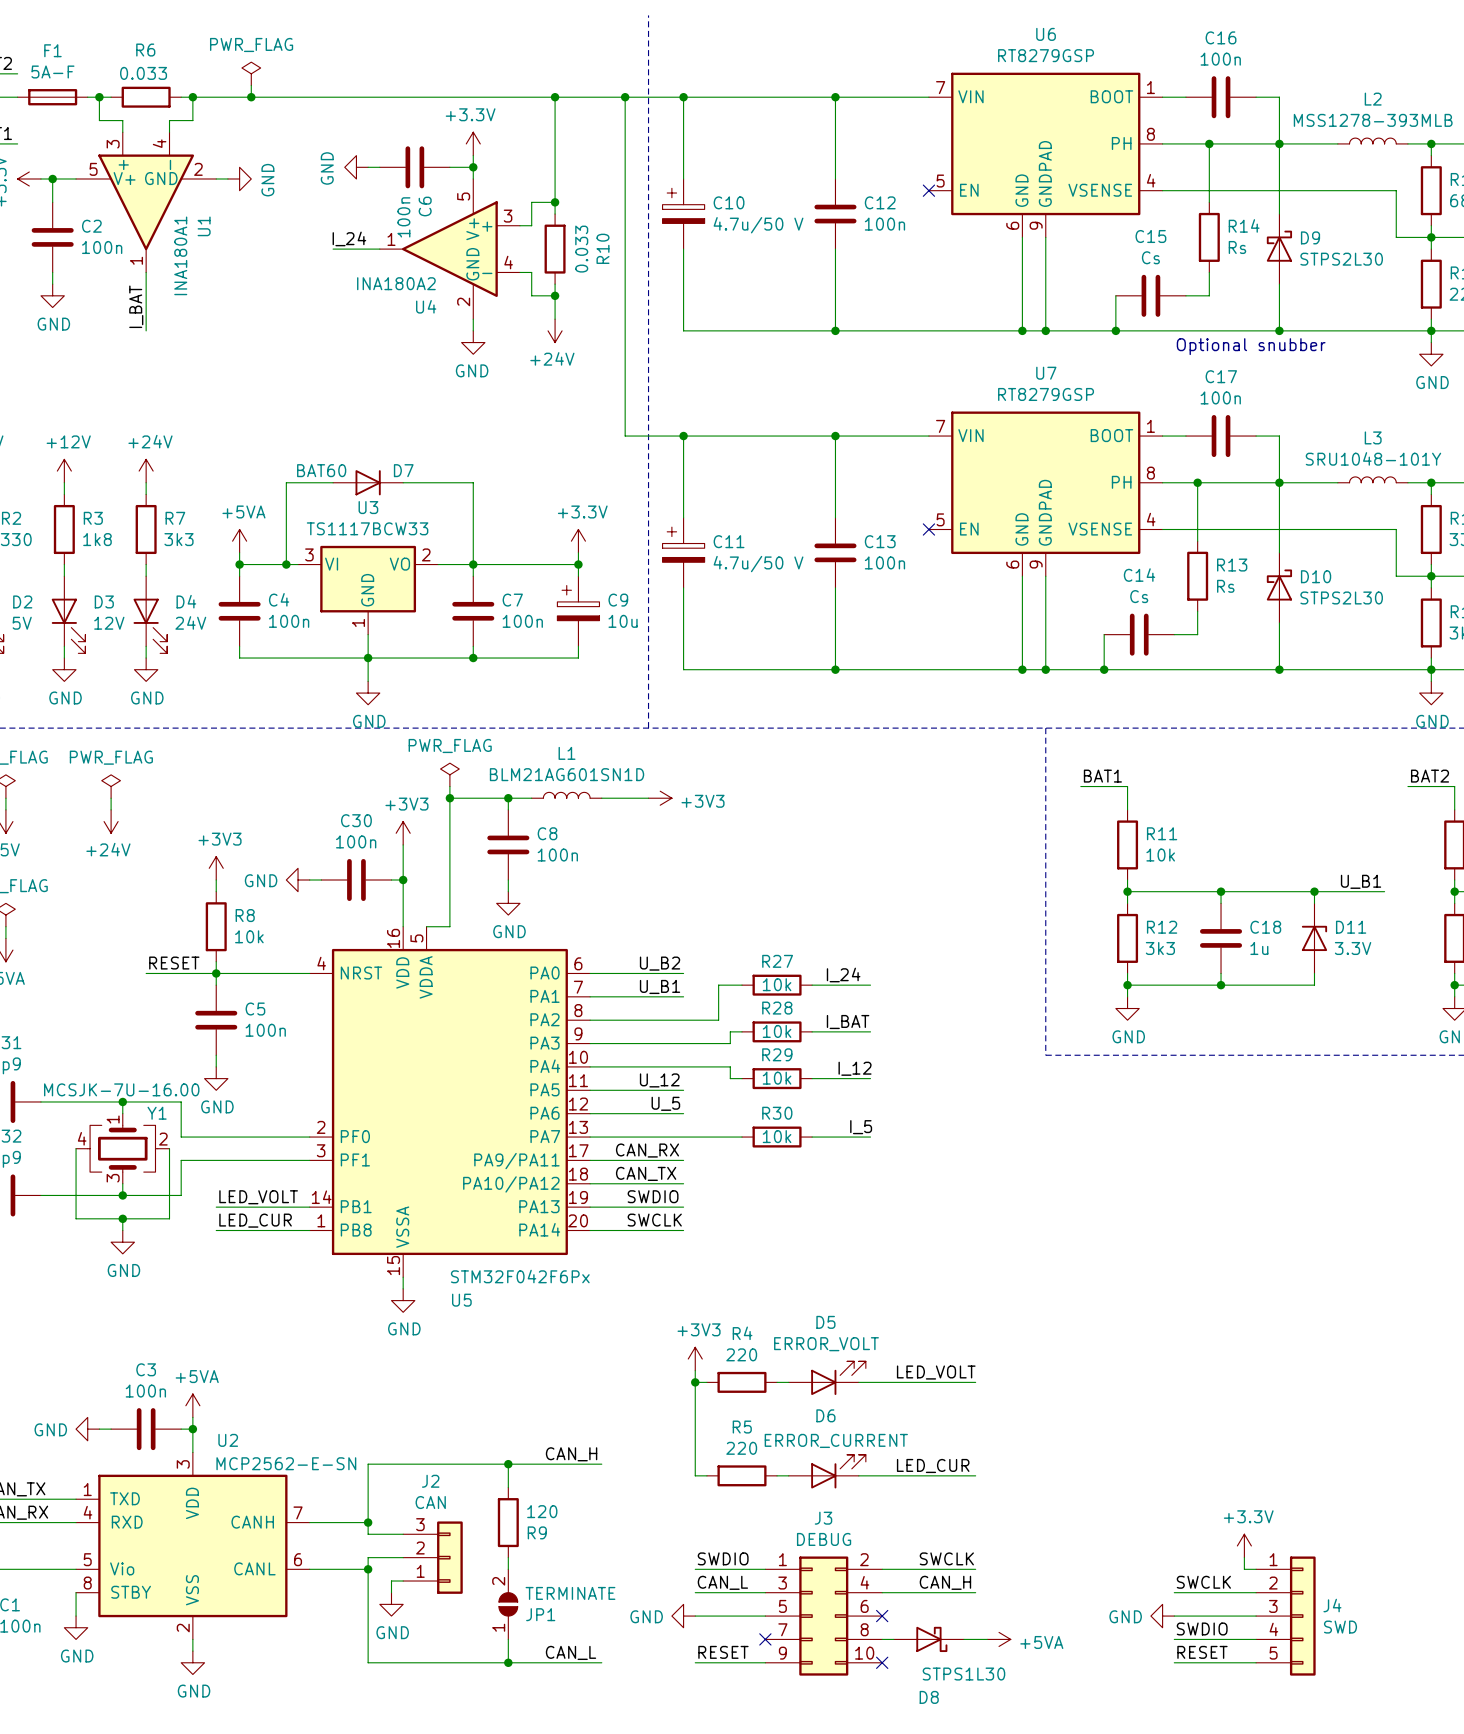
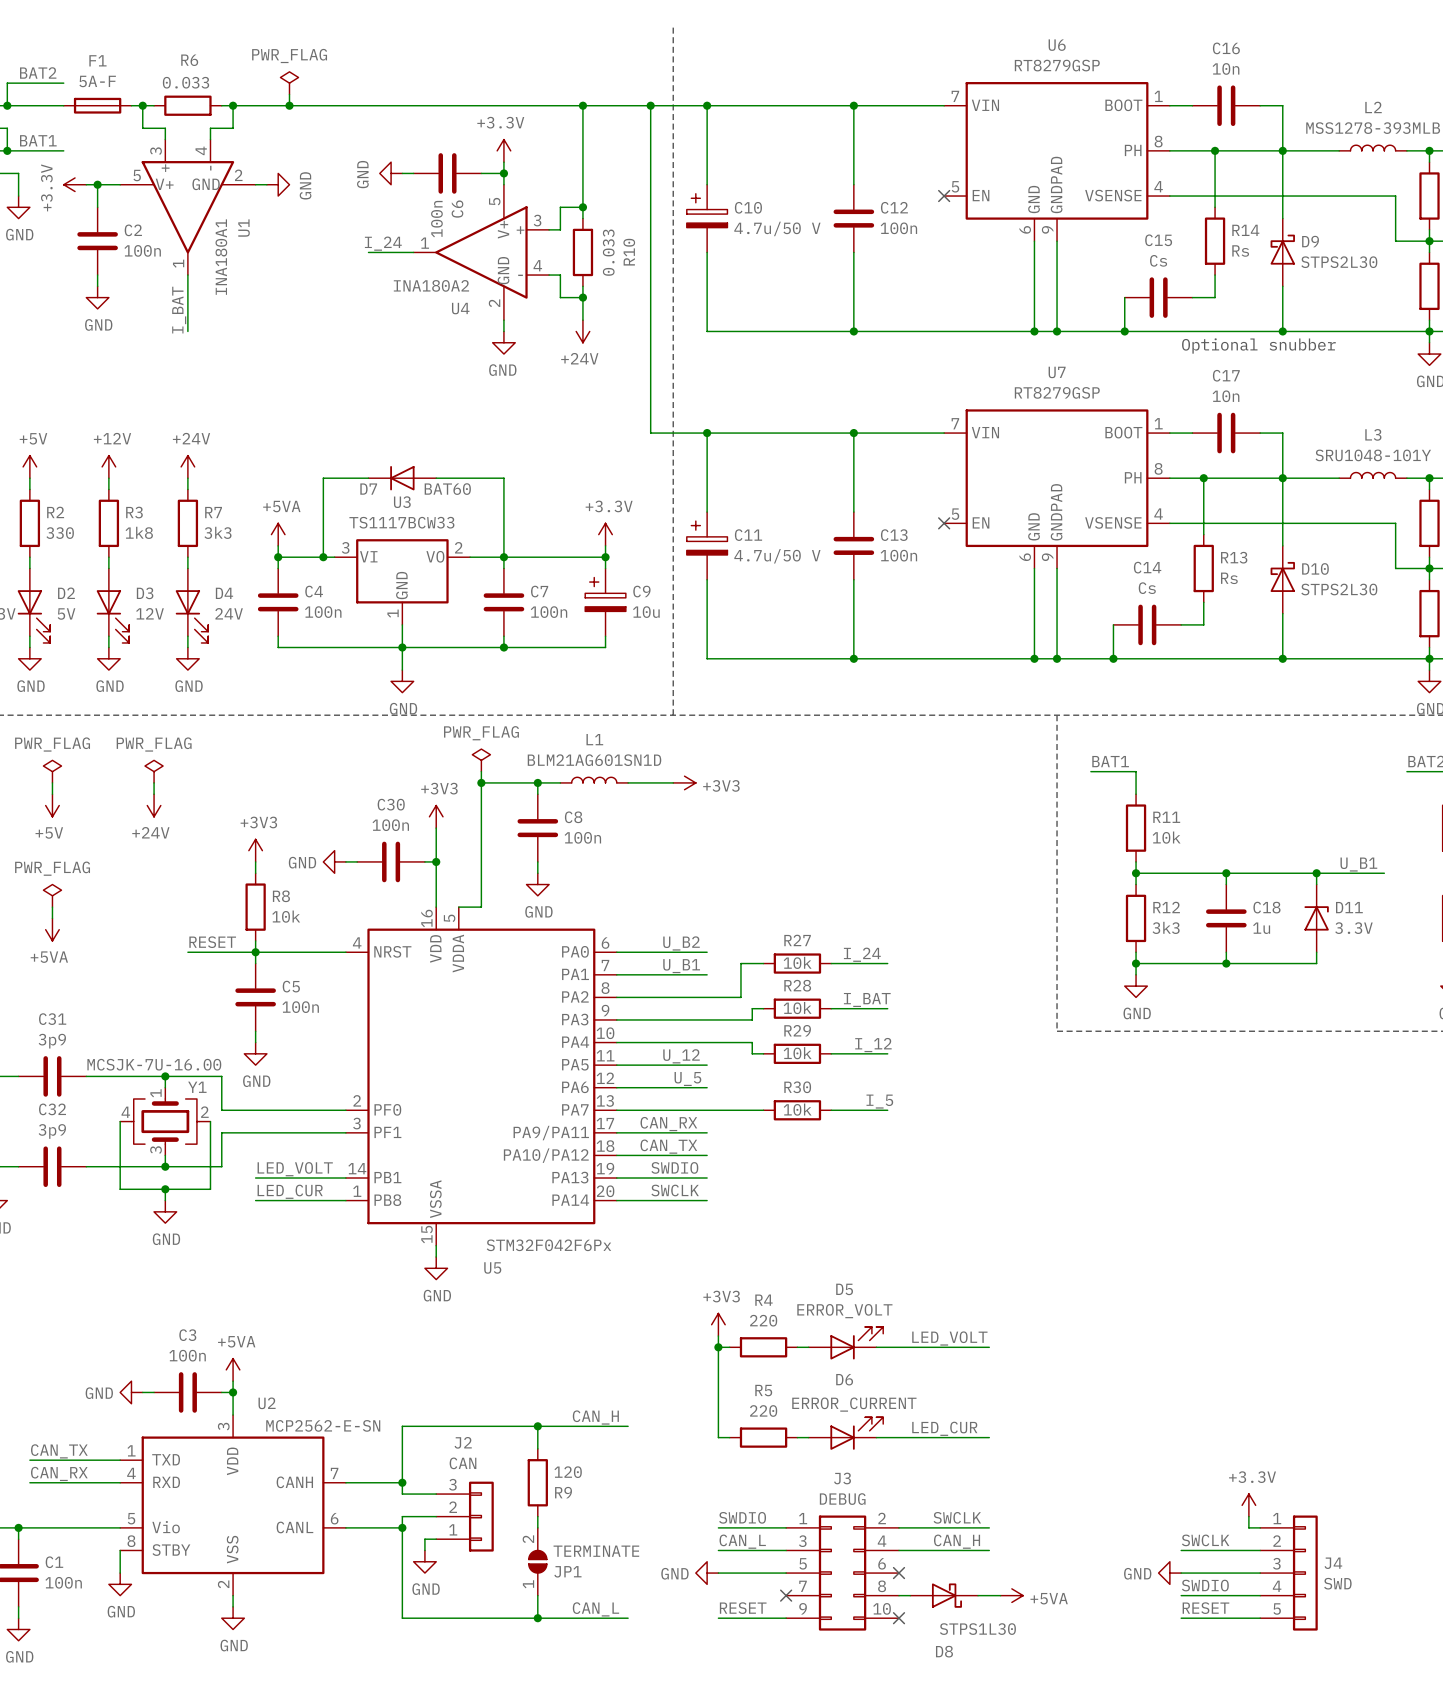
C16 value: 100n (1220, 59) -> 10n (1226, 68)
C17 value: 100n (1220, 397) -> 10n (1226, 396)
D7 rotation: 0° (368, 482) -> 180° (402, 478)

